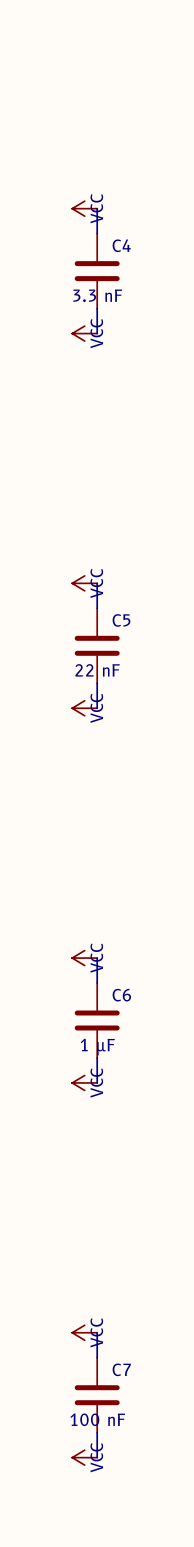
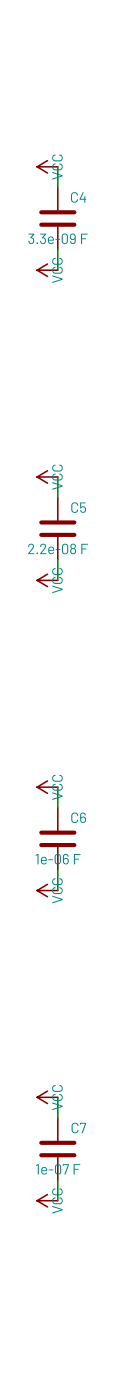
C4 value: 3.3 nF (97, 295) -> 3.3e-09 F (58, 238)
C5 value: 22 nF (97, 670) -> 2.2e-08 F (58, 548)
C6 value: 1 µF (97, 1047) -> 1e-06 F (58, 859)
C7 value: 100 nF (97, 1419) -> 1e-07 F (58, 1169)

